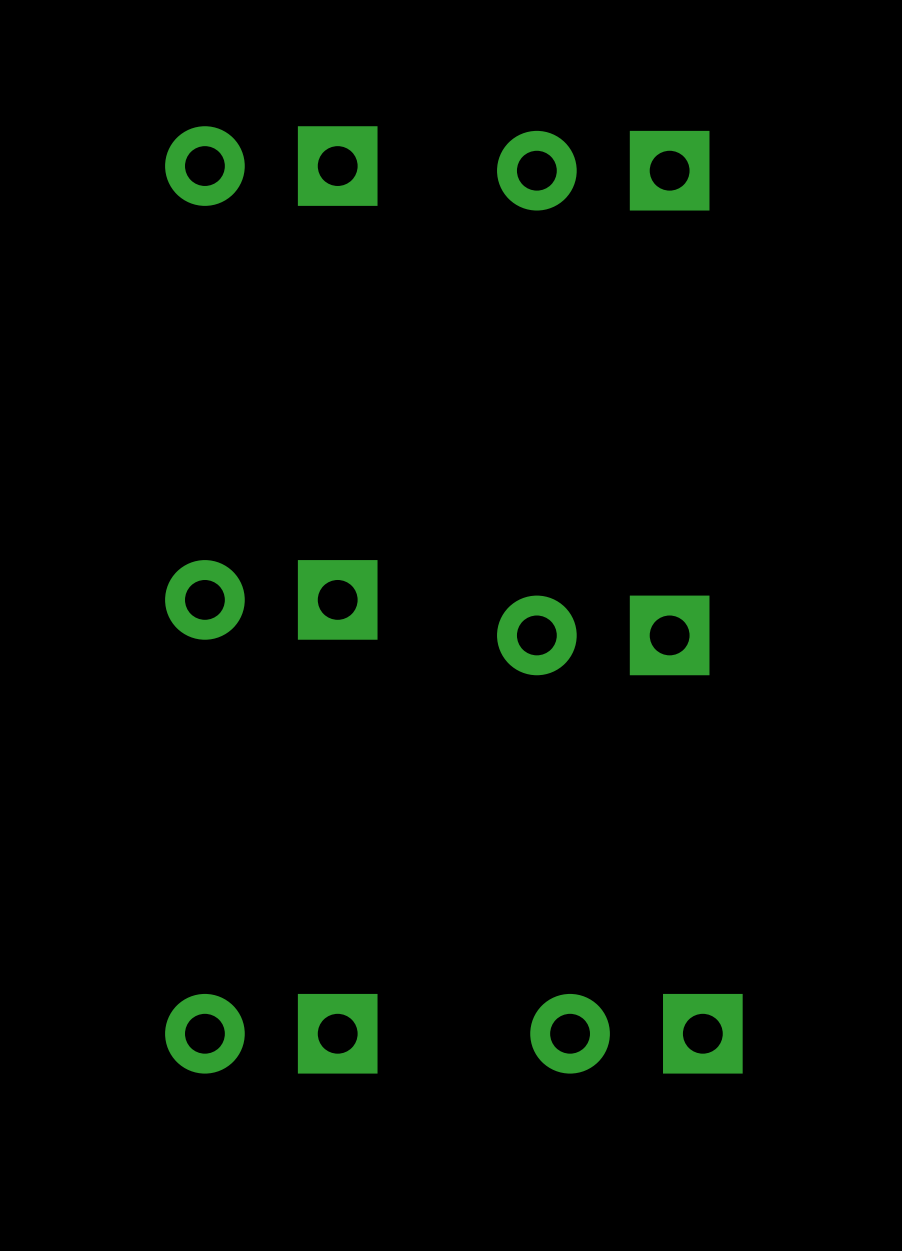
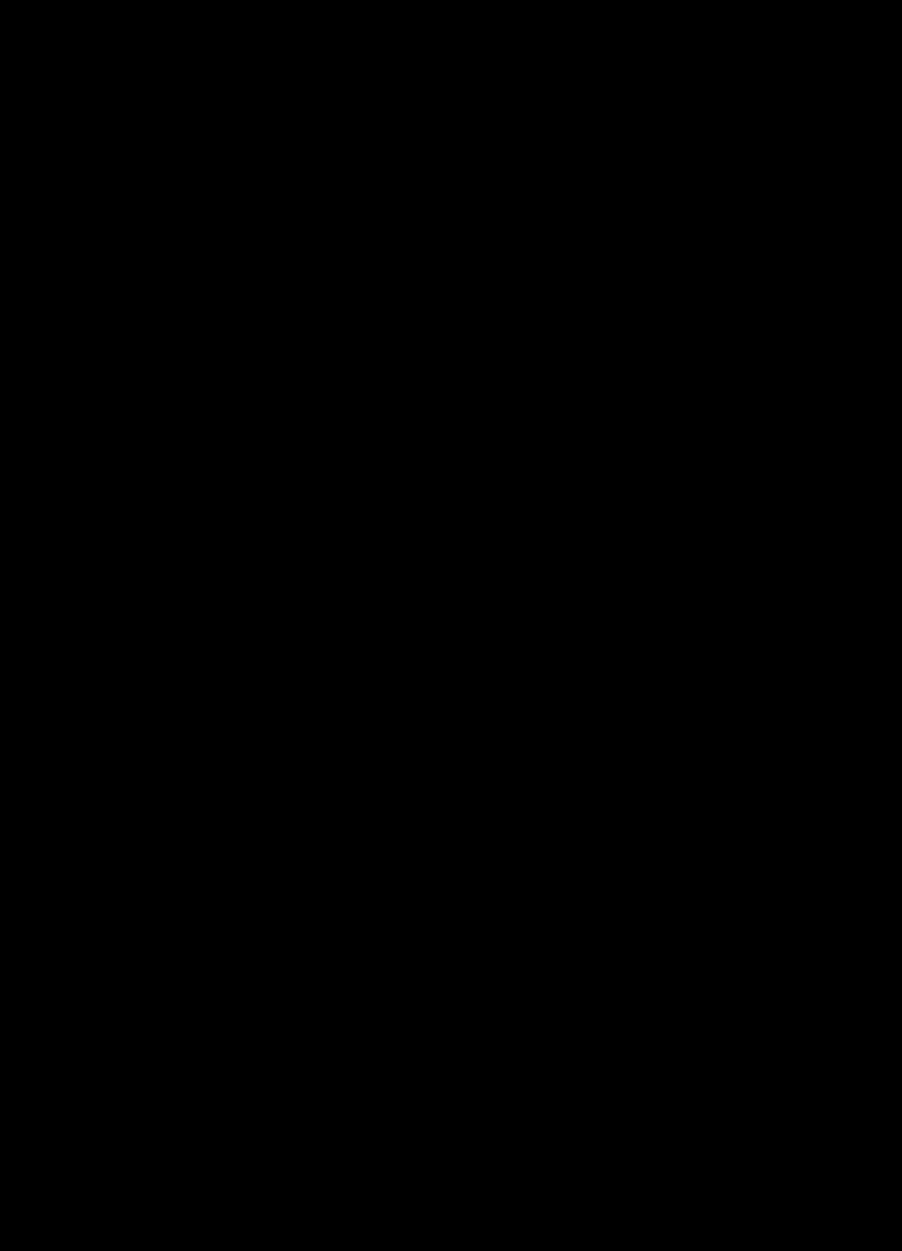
part: (271, 166) -> none
part: (603, 170) -> none
part: (271, 599) -> none
part: (603, 635) -> none
part: (271, 1033) -> none
part: (636, 1033) -> none

